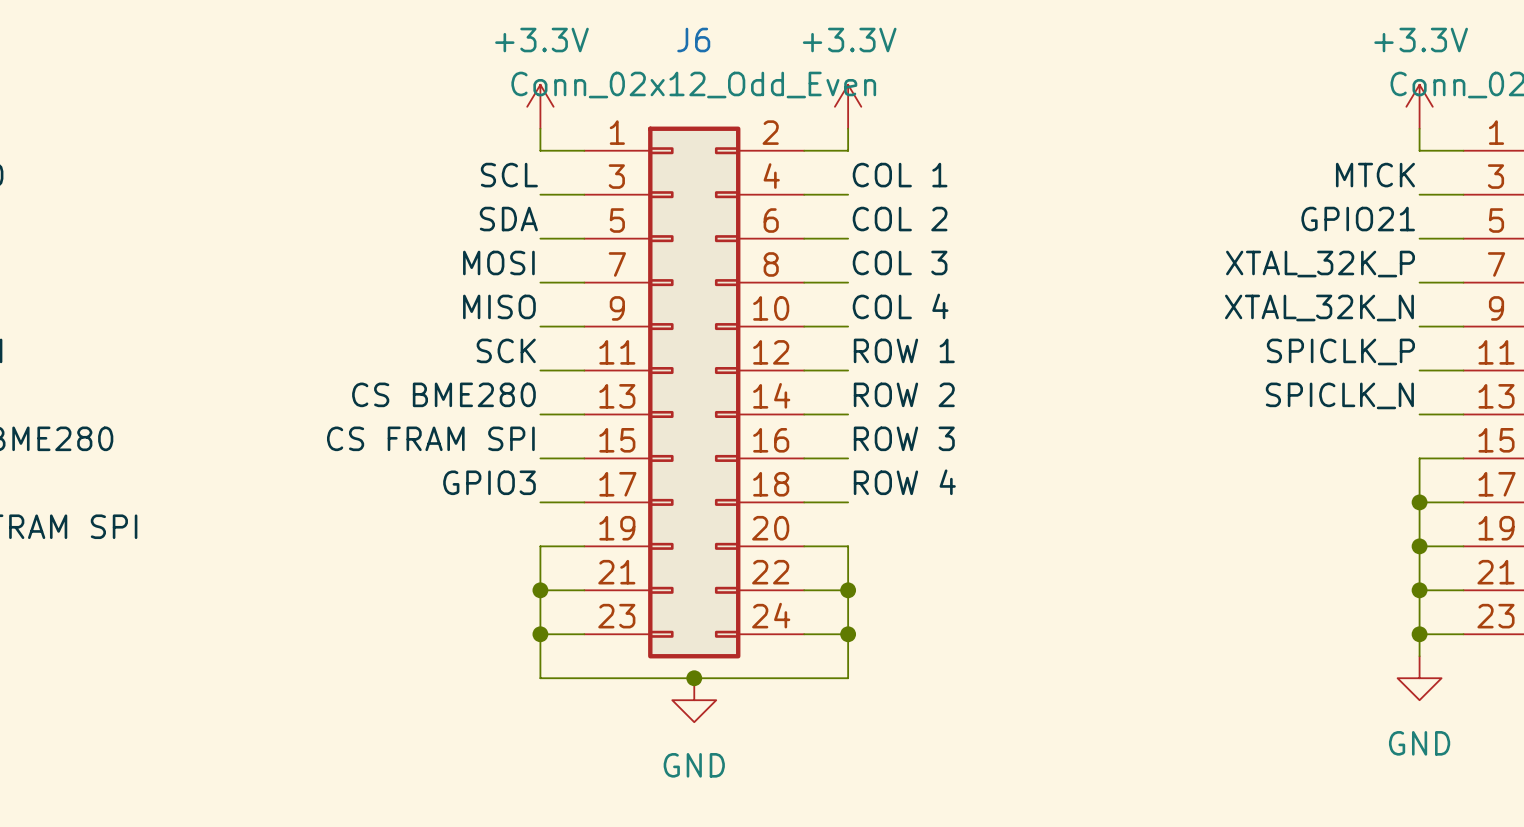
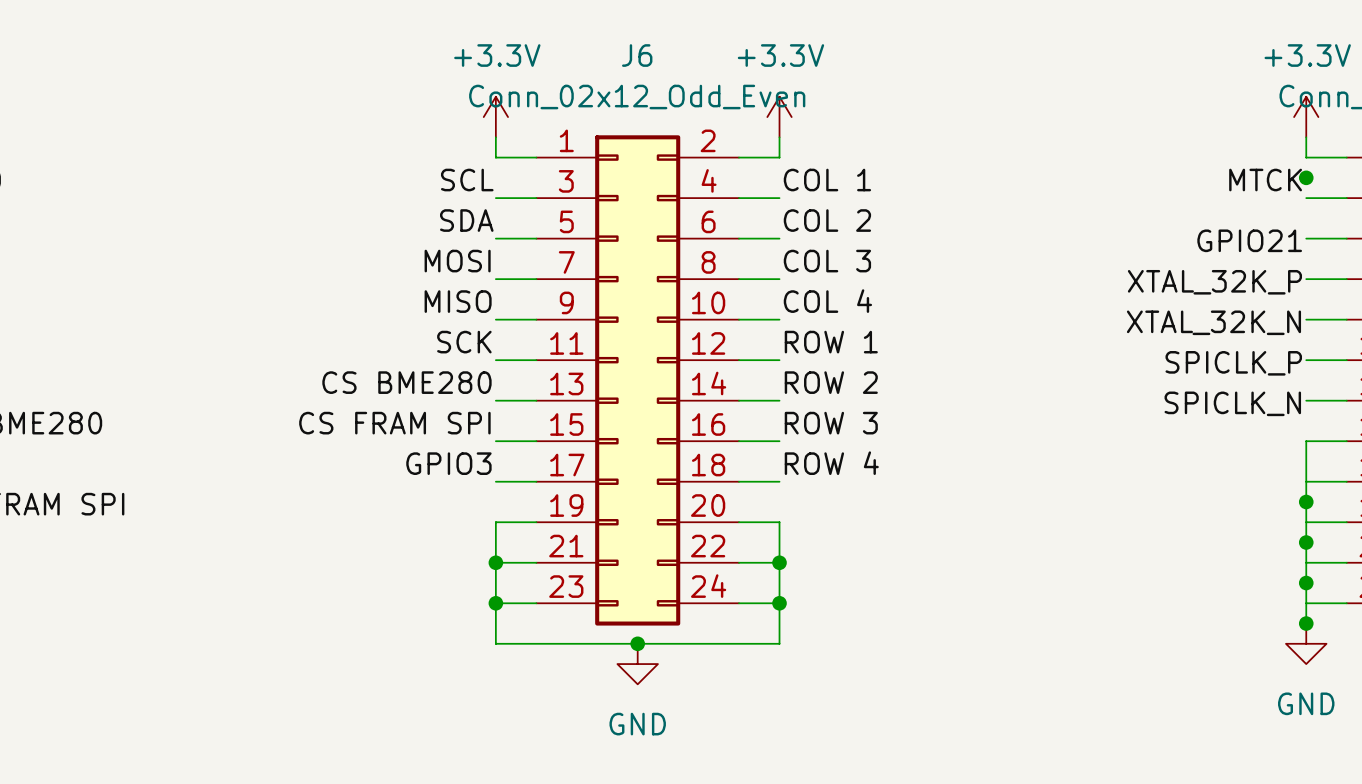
junction: none -> (1306, 177)
label position: GPIO21 (1358, 219) -> GPIO21 (1249, 240)
label position: XTAL_32K_P (1320, 264) -> XTAL_32K_P (1214, 282)
label position: XTAL_32K_N (1319, 307) -> XTAL_32K_N (1213, 322)
label position: SPICLK_P (1340, 351) -> SPICLK_P (1233, 363)
label position: SPICLK_N (1339, 395) -> SPICLK_N (1232, 403)
junction: (1419, 502) -> none
junction: none -> (1306, 501)
junction: (1419, 546) -> none
junction: none -> (1306, 542)
junction: (1419, 590) -> none
junction: none -> (1306, 583)
junction: (1419, 634) -> none
junction: none -> (1306, 623)

